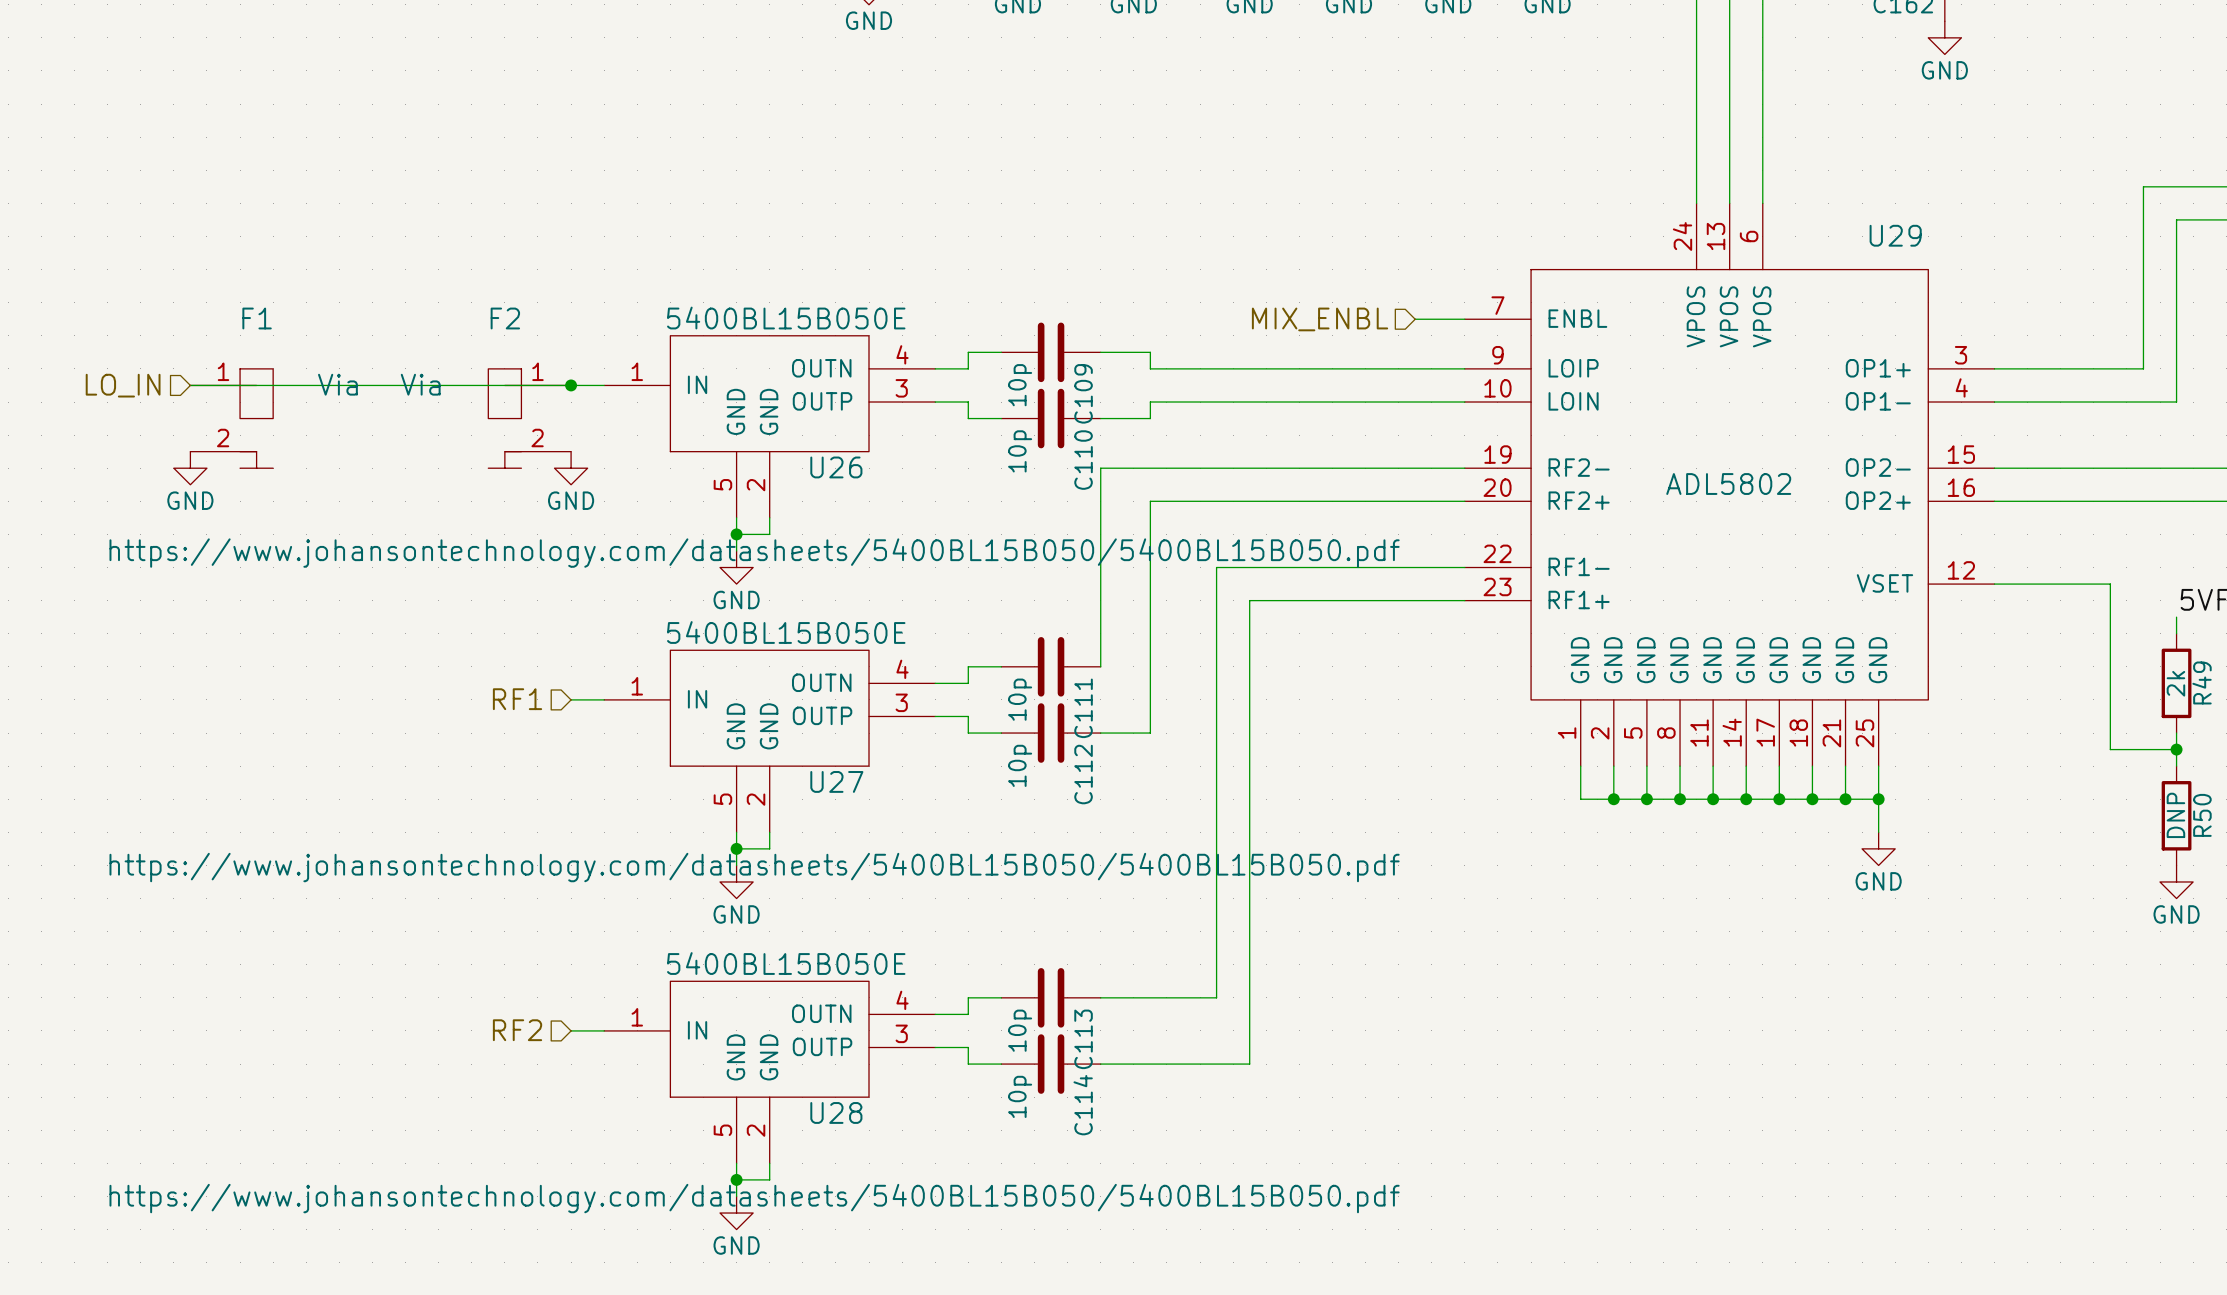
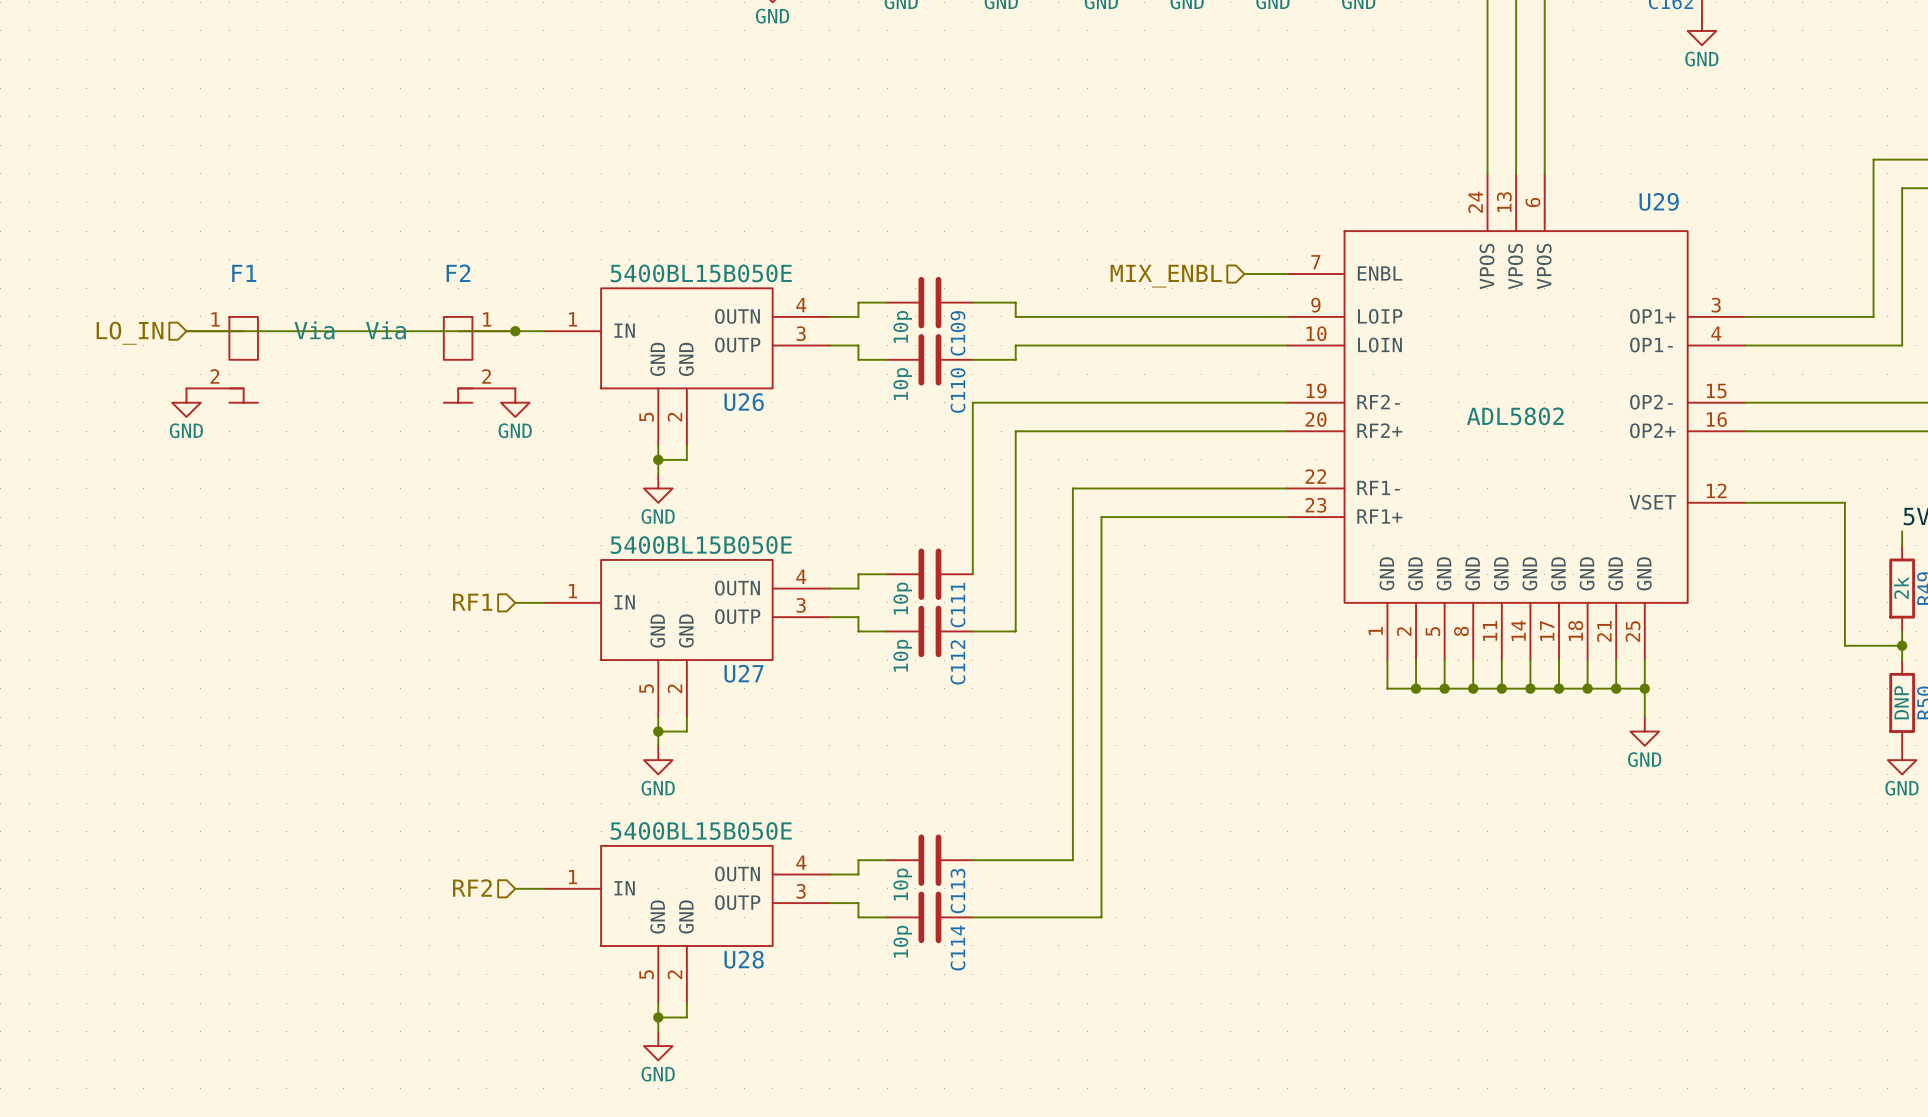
U26 text: https://www.johansontechnology.com/datasheets/5400BL15B050/5400BL15B050.pdf (754, 553) -> none
U27 text: https://www.johansontechnology.com/datasheets/5400BL15B050/5400BL15B050.pdf (754, 867) -> none
U28 text: https://www.johansontechnology.com/datasheets/5400BL15B050/5400BL15B050.pdf (754, 1198) -> none

